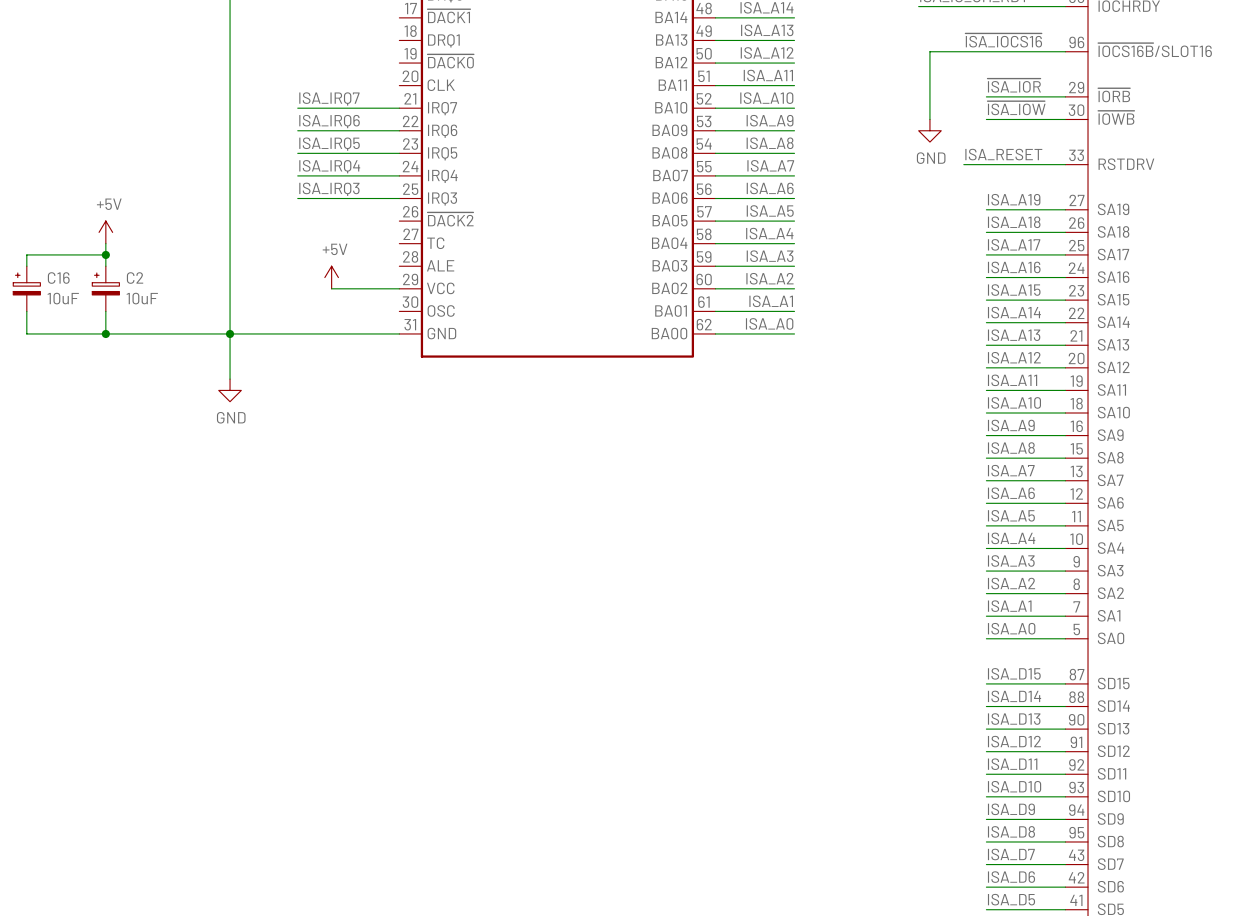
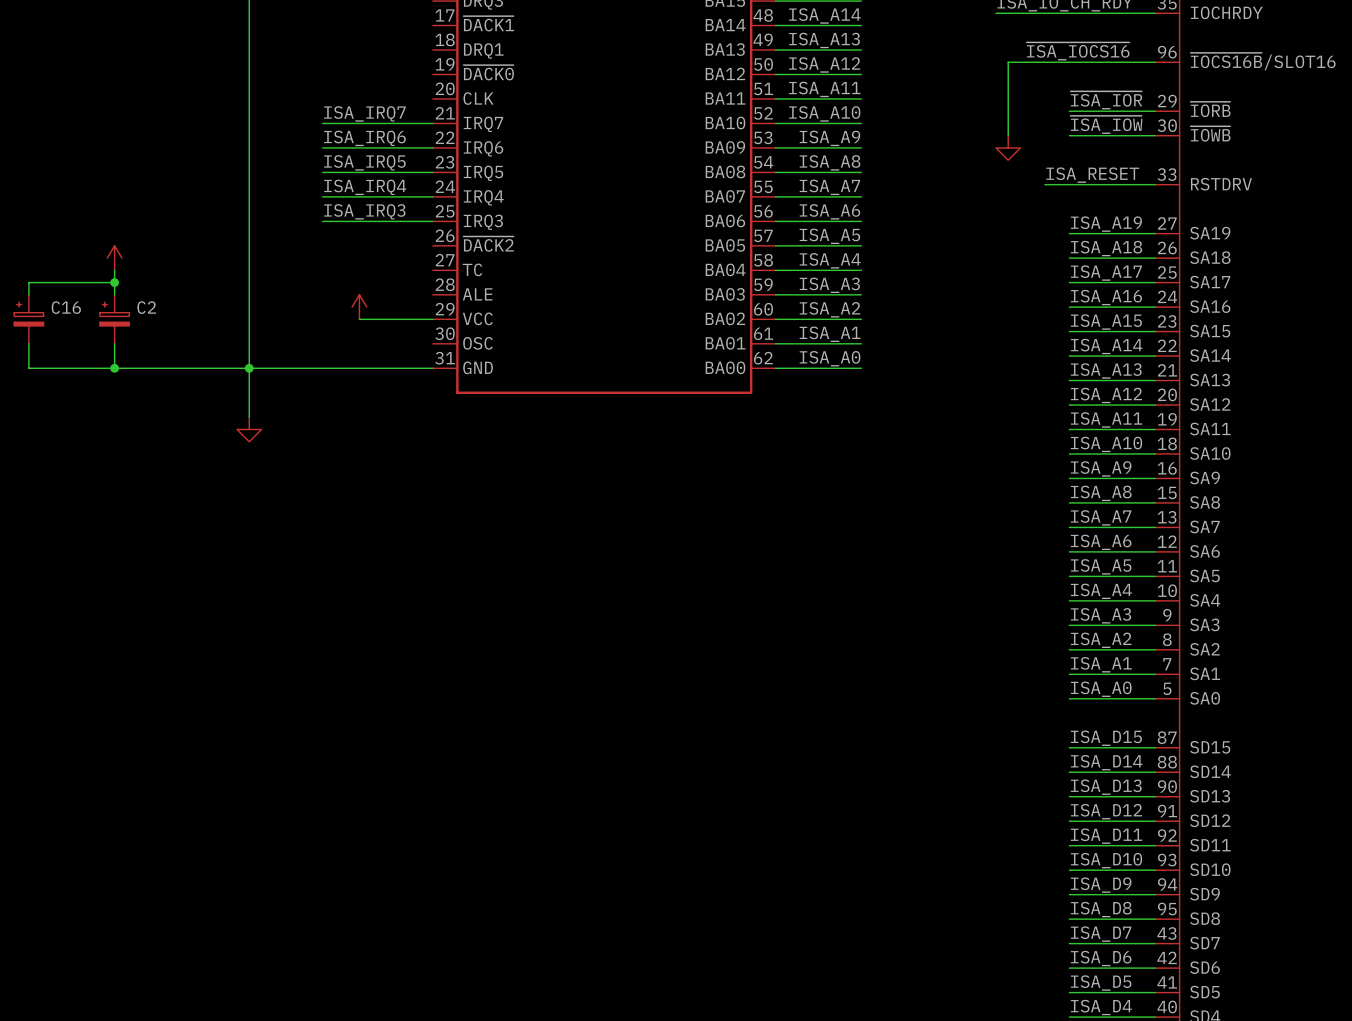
power symbol text: GND (931, 158) -> none
power symbol text: +5V (109, 204) -> none
power symbol text: +5V (335, 249) -> none
C16 value: 10uF (63, 298) -> none
C2 value: 10uF (142, 298) -> none
power symbol text: GND (231, 417) -> none

